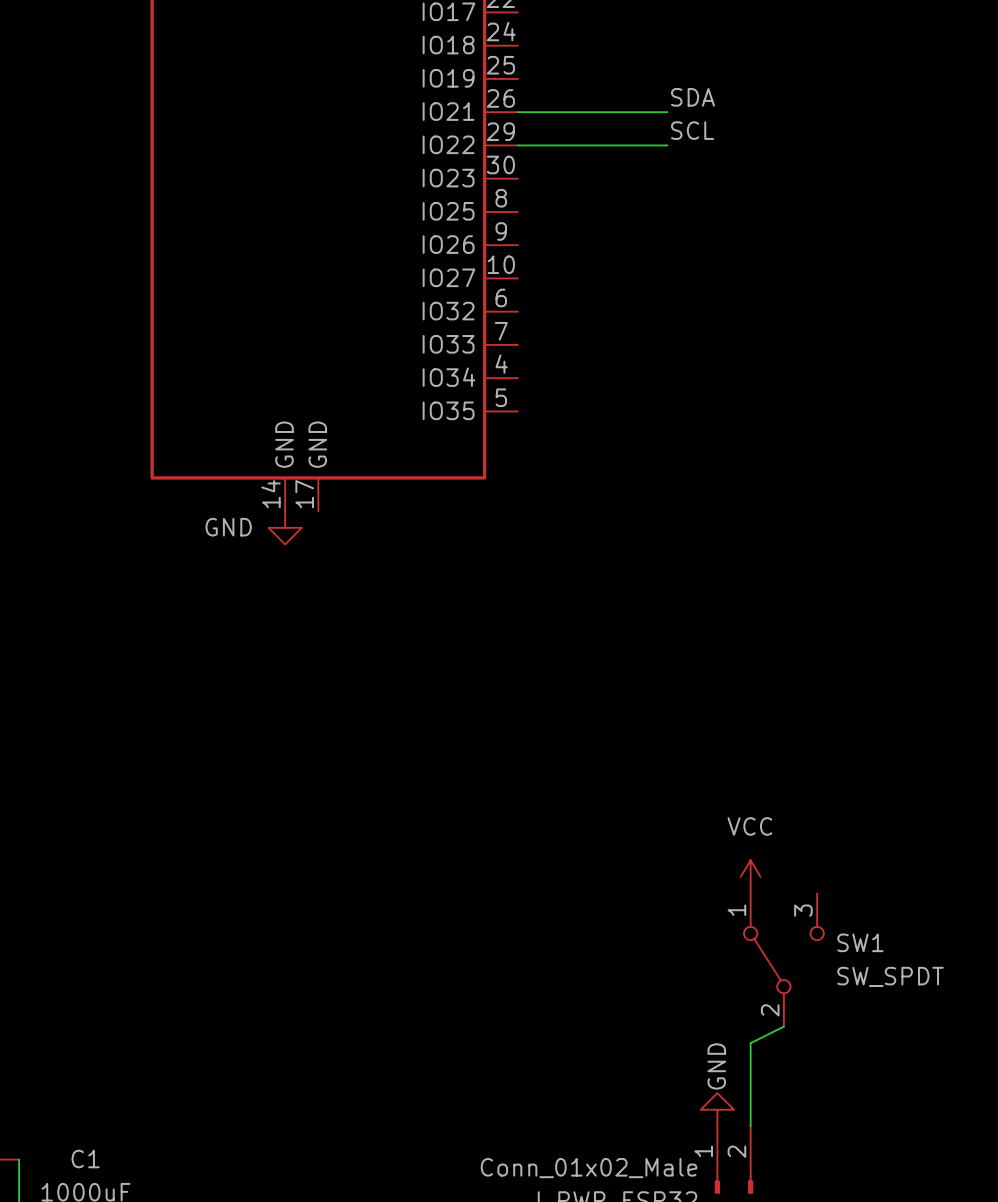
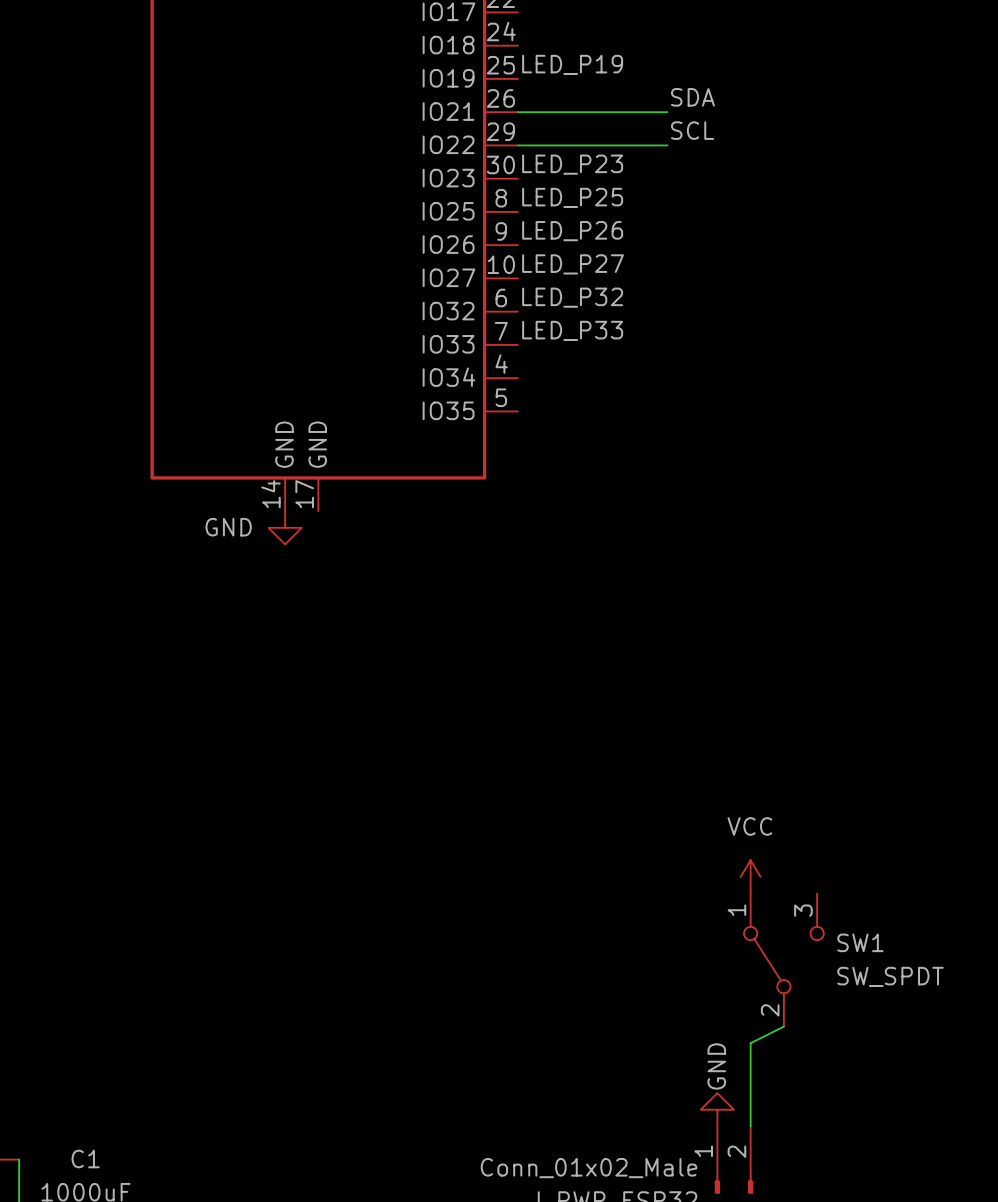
label: none -> LED_P19 (572, 64)
label: none -> LED_P23 (572, 164)
label: none -> LED_P25 (572, 197)
label: none -> LED_P26 (572, 231)
label: none -> LED_P27 (573, 264)
label: none -> LED_P32 (572, 297)
label: none -> LED_P33 (572, 330)

